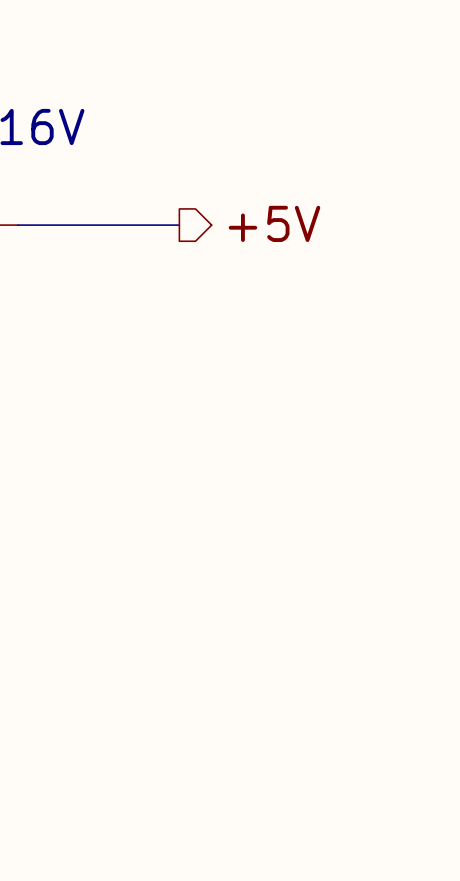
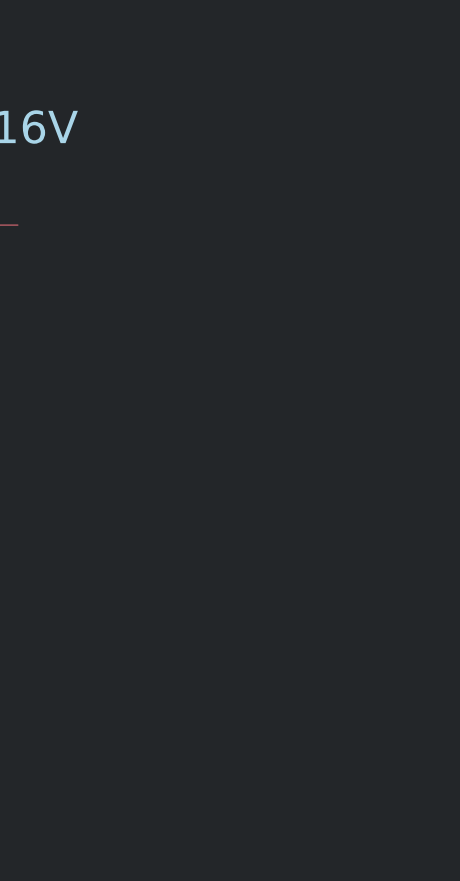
hierarchical label: +5V (274, 223) -> none
wire: (17, 225) (179, 225) -> none

